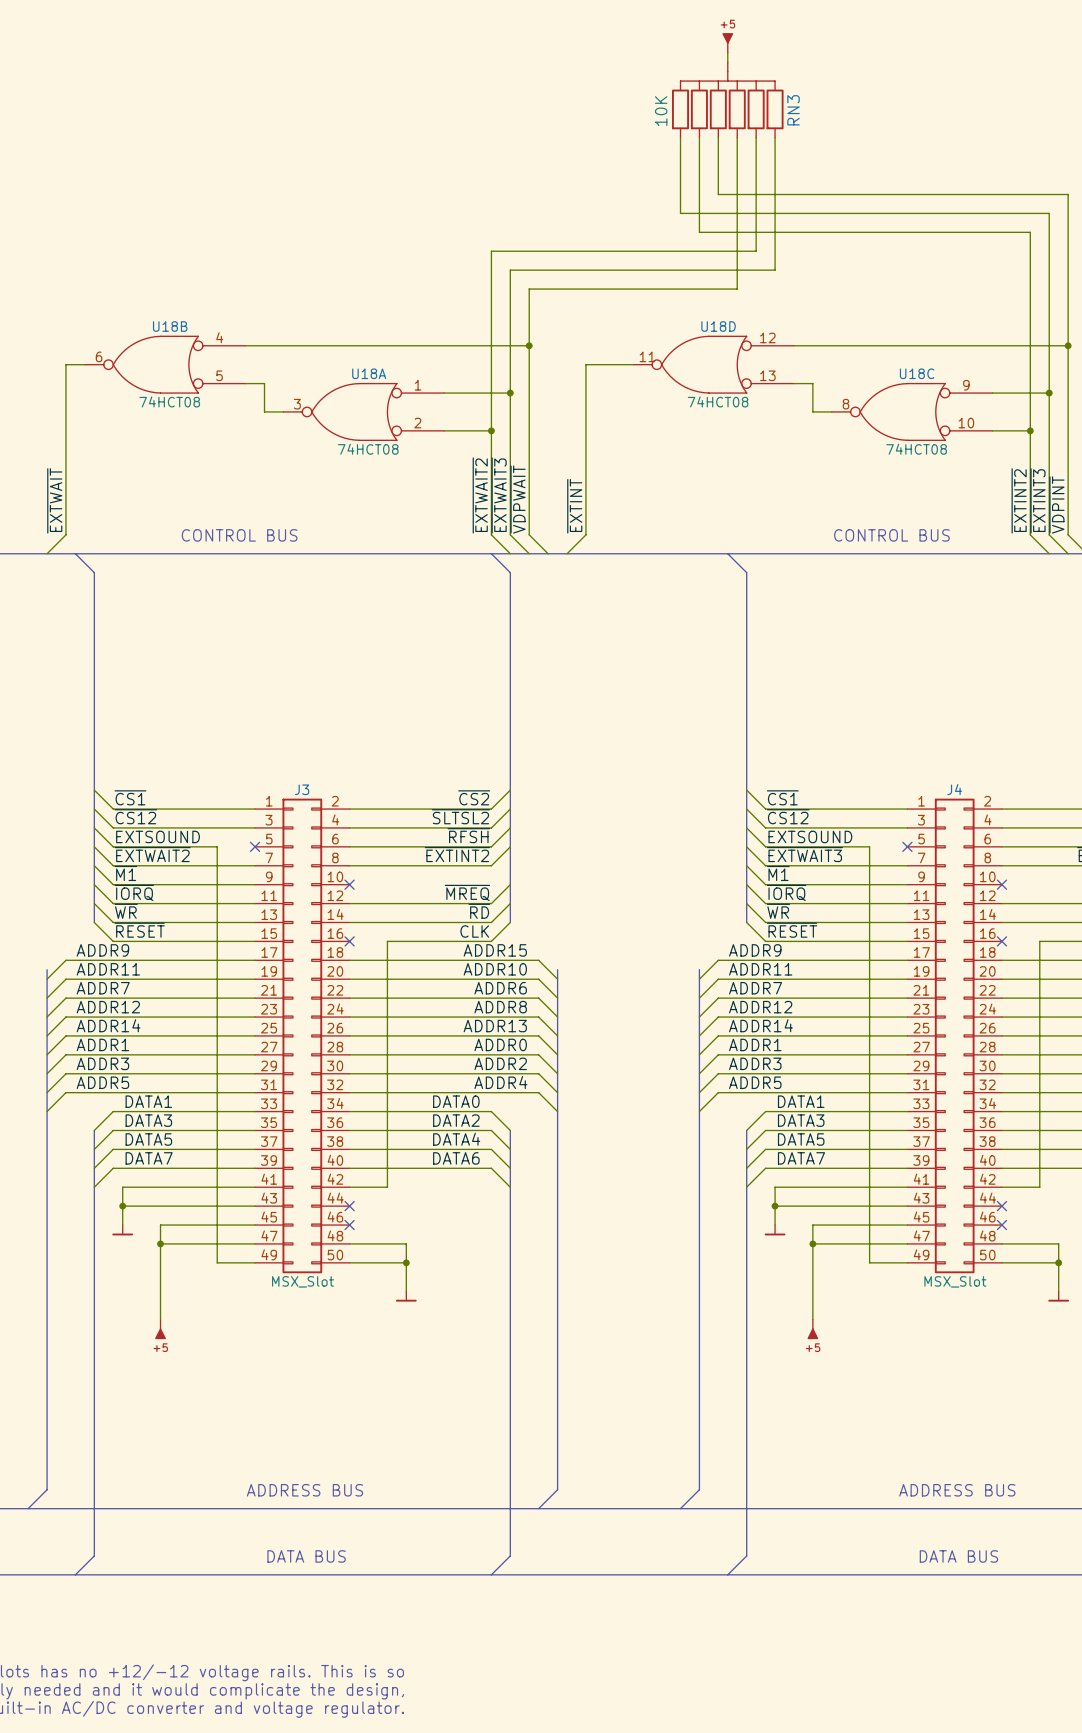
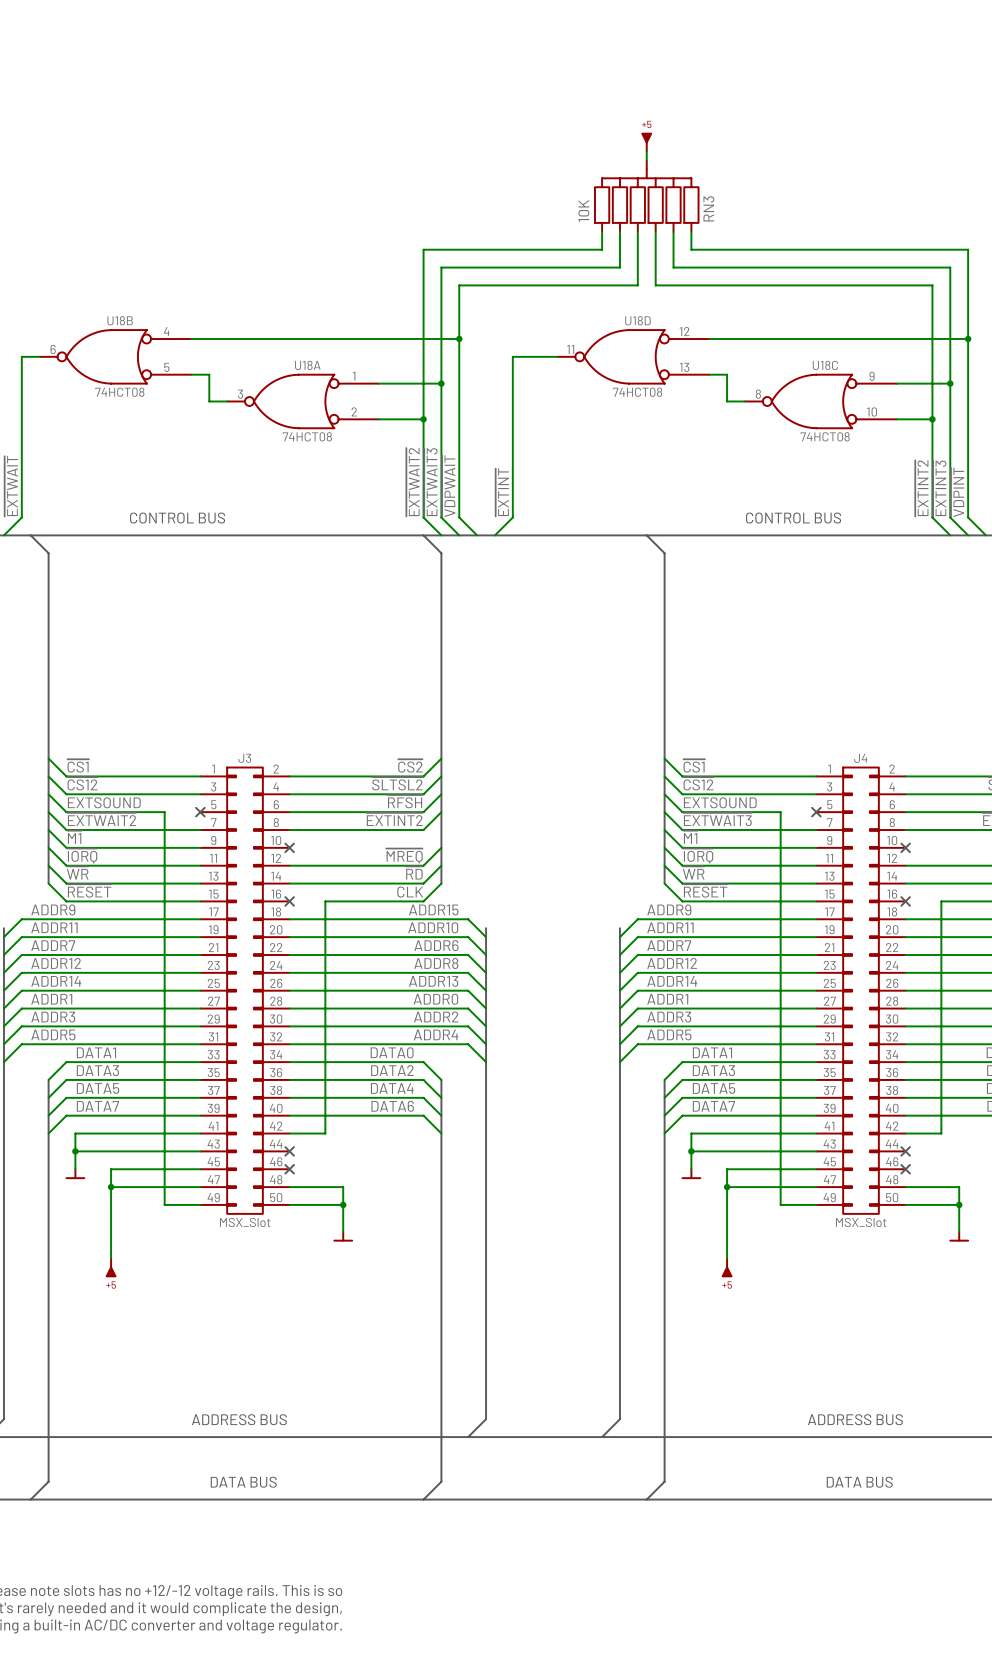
power symbol position: (727, 43) -> (646, 142)
wire: (727, 52) (727, 62) -> (646, 151) (646, 160)
RN3 position: (727, 99) -> (646, 196)
wire: (680, 137) (680, 213) (1049, 213) (1049, 270) -> (691, 267) (950, 267)
wire: (699, 137) (699, 232) (1030, 232) (1030, 289) -> (655, 285) (932, 285)
wire: (718, 137) (718, 194) (1068, 194) (1068, 251) -> (691, 249) (968, 249)
wire: (737, 137) (737, 232) -> none
wire: (756, 137) (756, 232) -> none
wire: (775, 137) (775, 232) -> none
wire: none -> (619, 231) (619, 267)
wire: (680, 251) (756, 251) -> (602, 249) (602, 231)
wire: (775, 251) (775, 270) -> none
wire: (699, 270) (756, 270) -> (673, 249) (673, 267)
wire: (718, 289) (737, 289) -> (637, 285) (637, 231)

